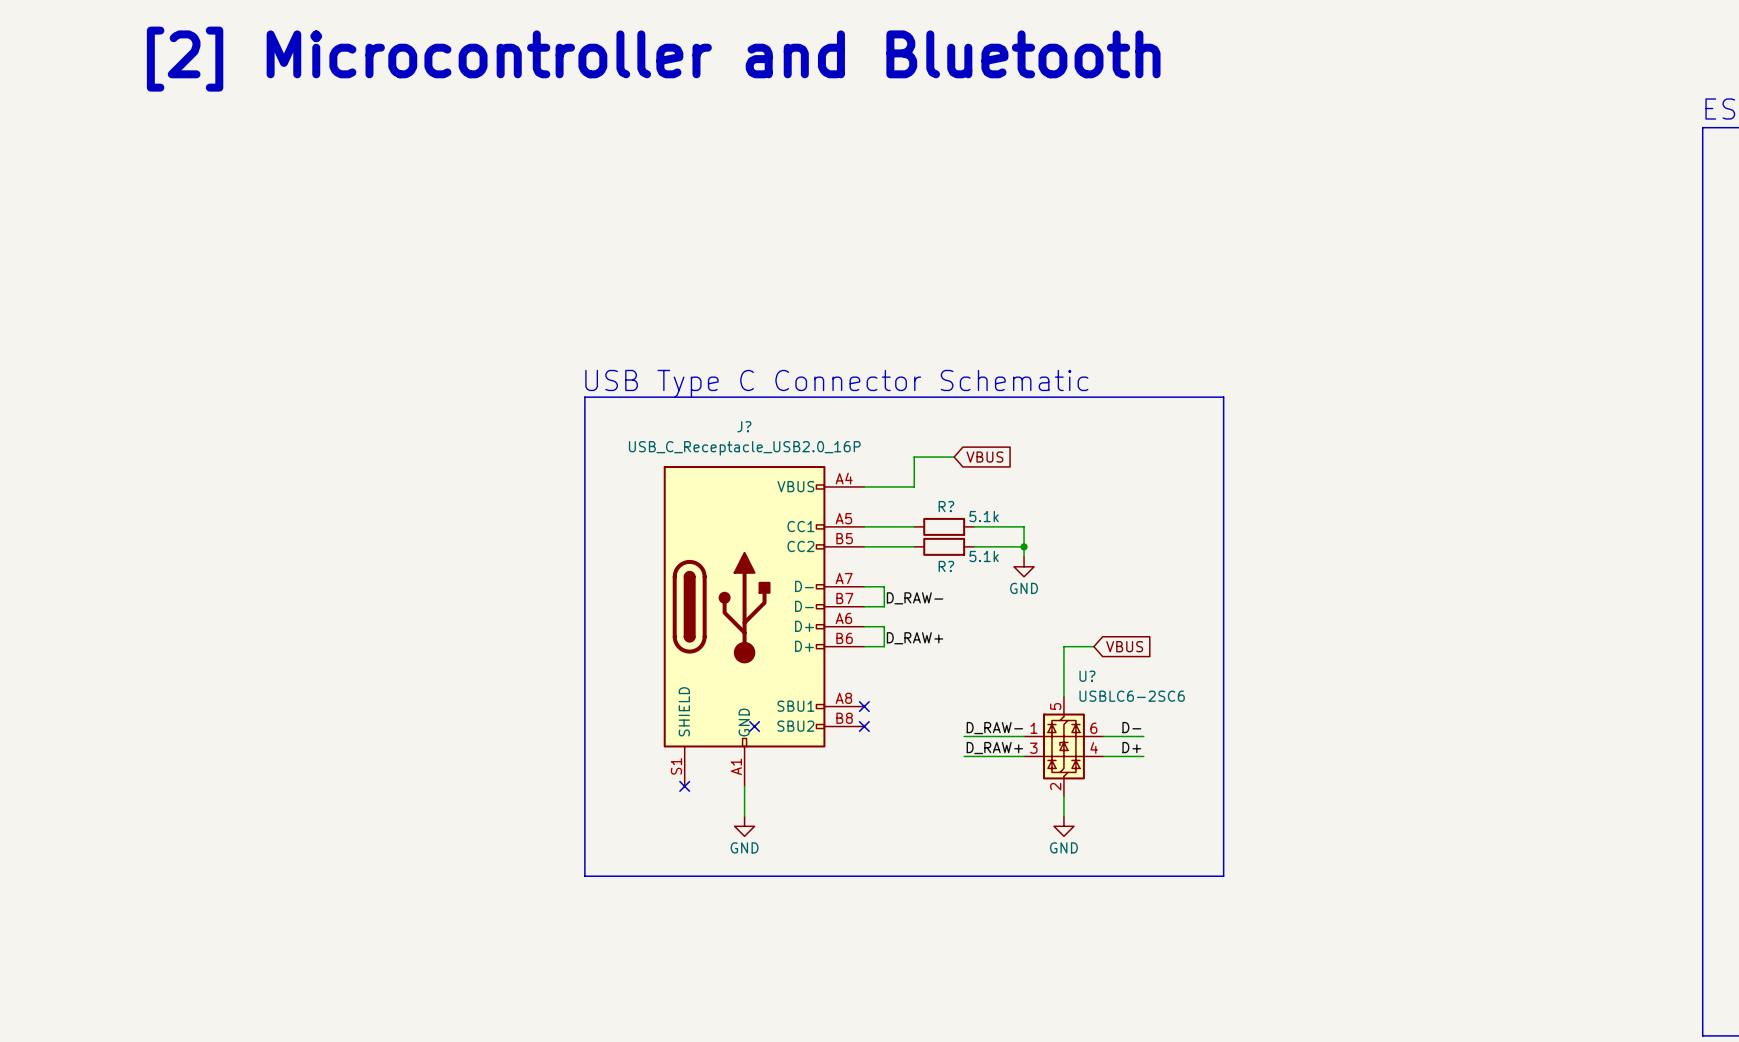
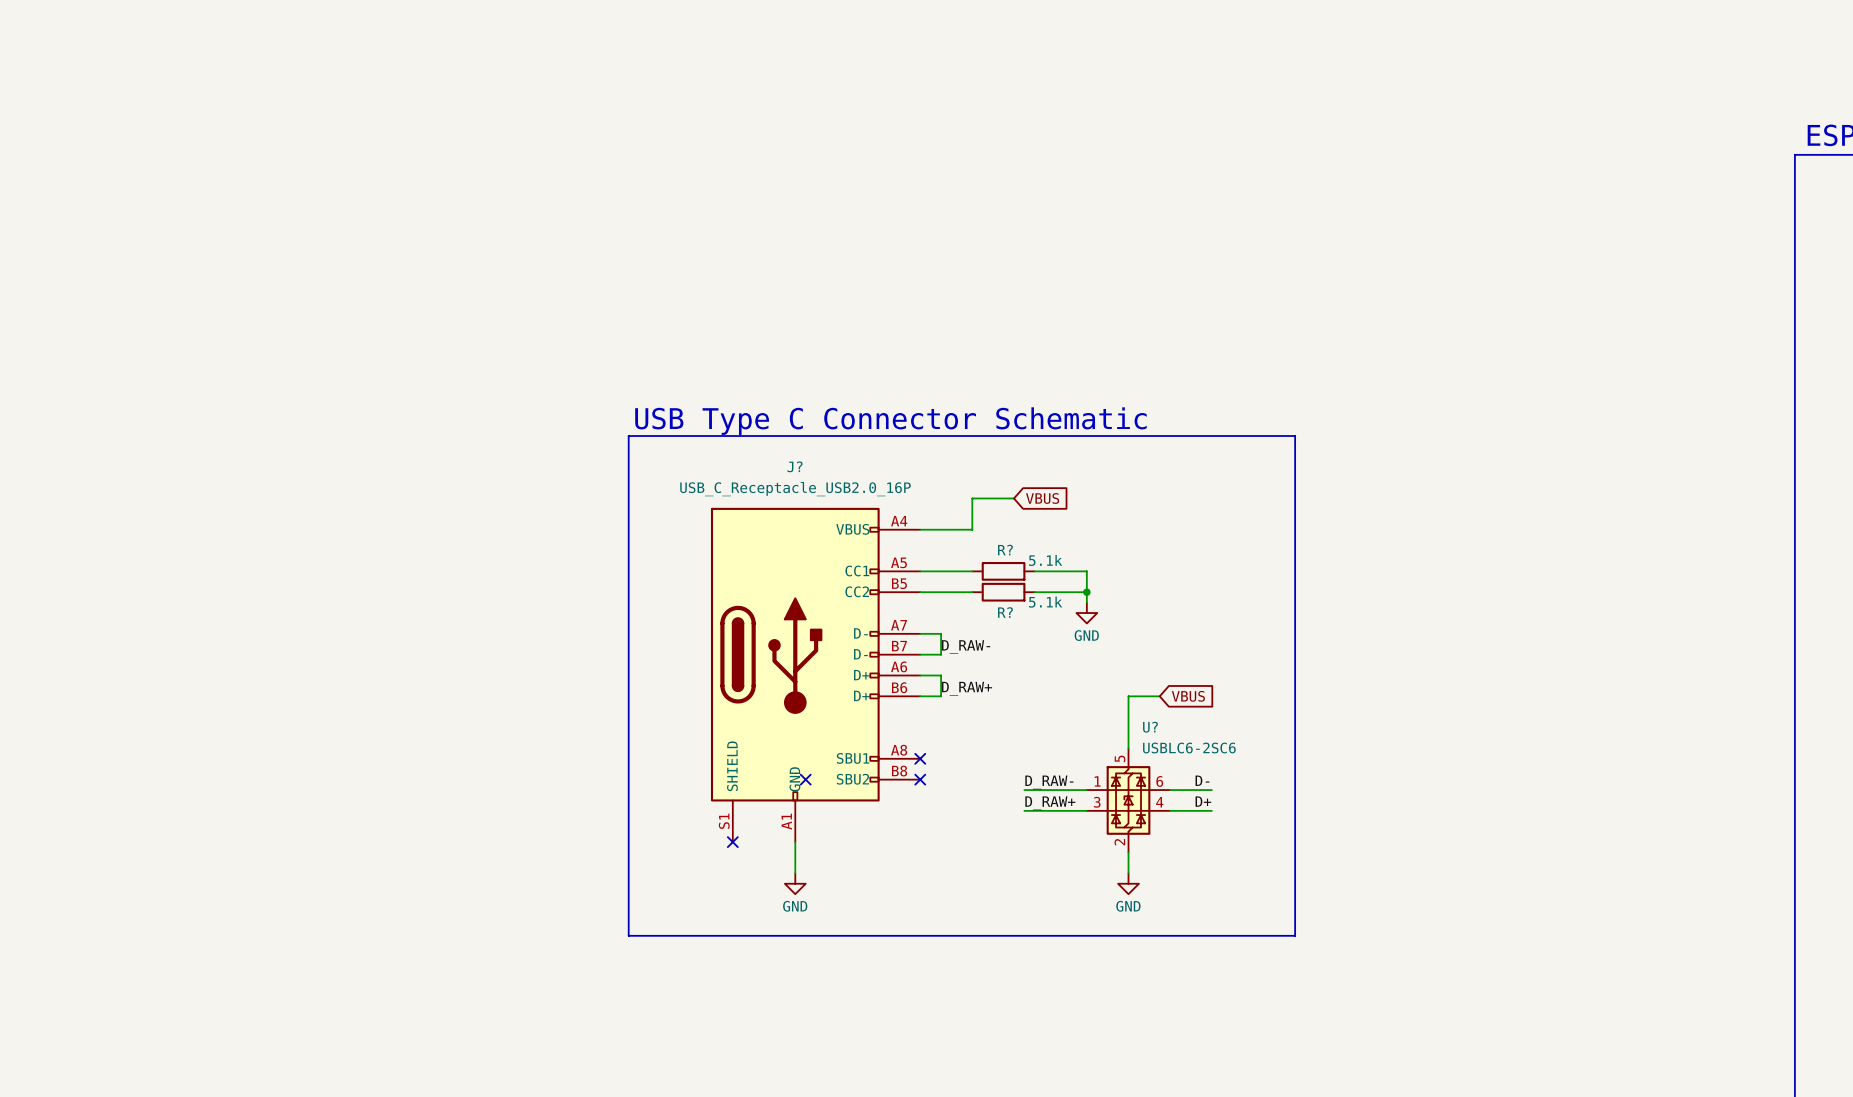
text: [2] Microcontroller and Bluetooth (653, 59) -> none

